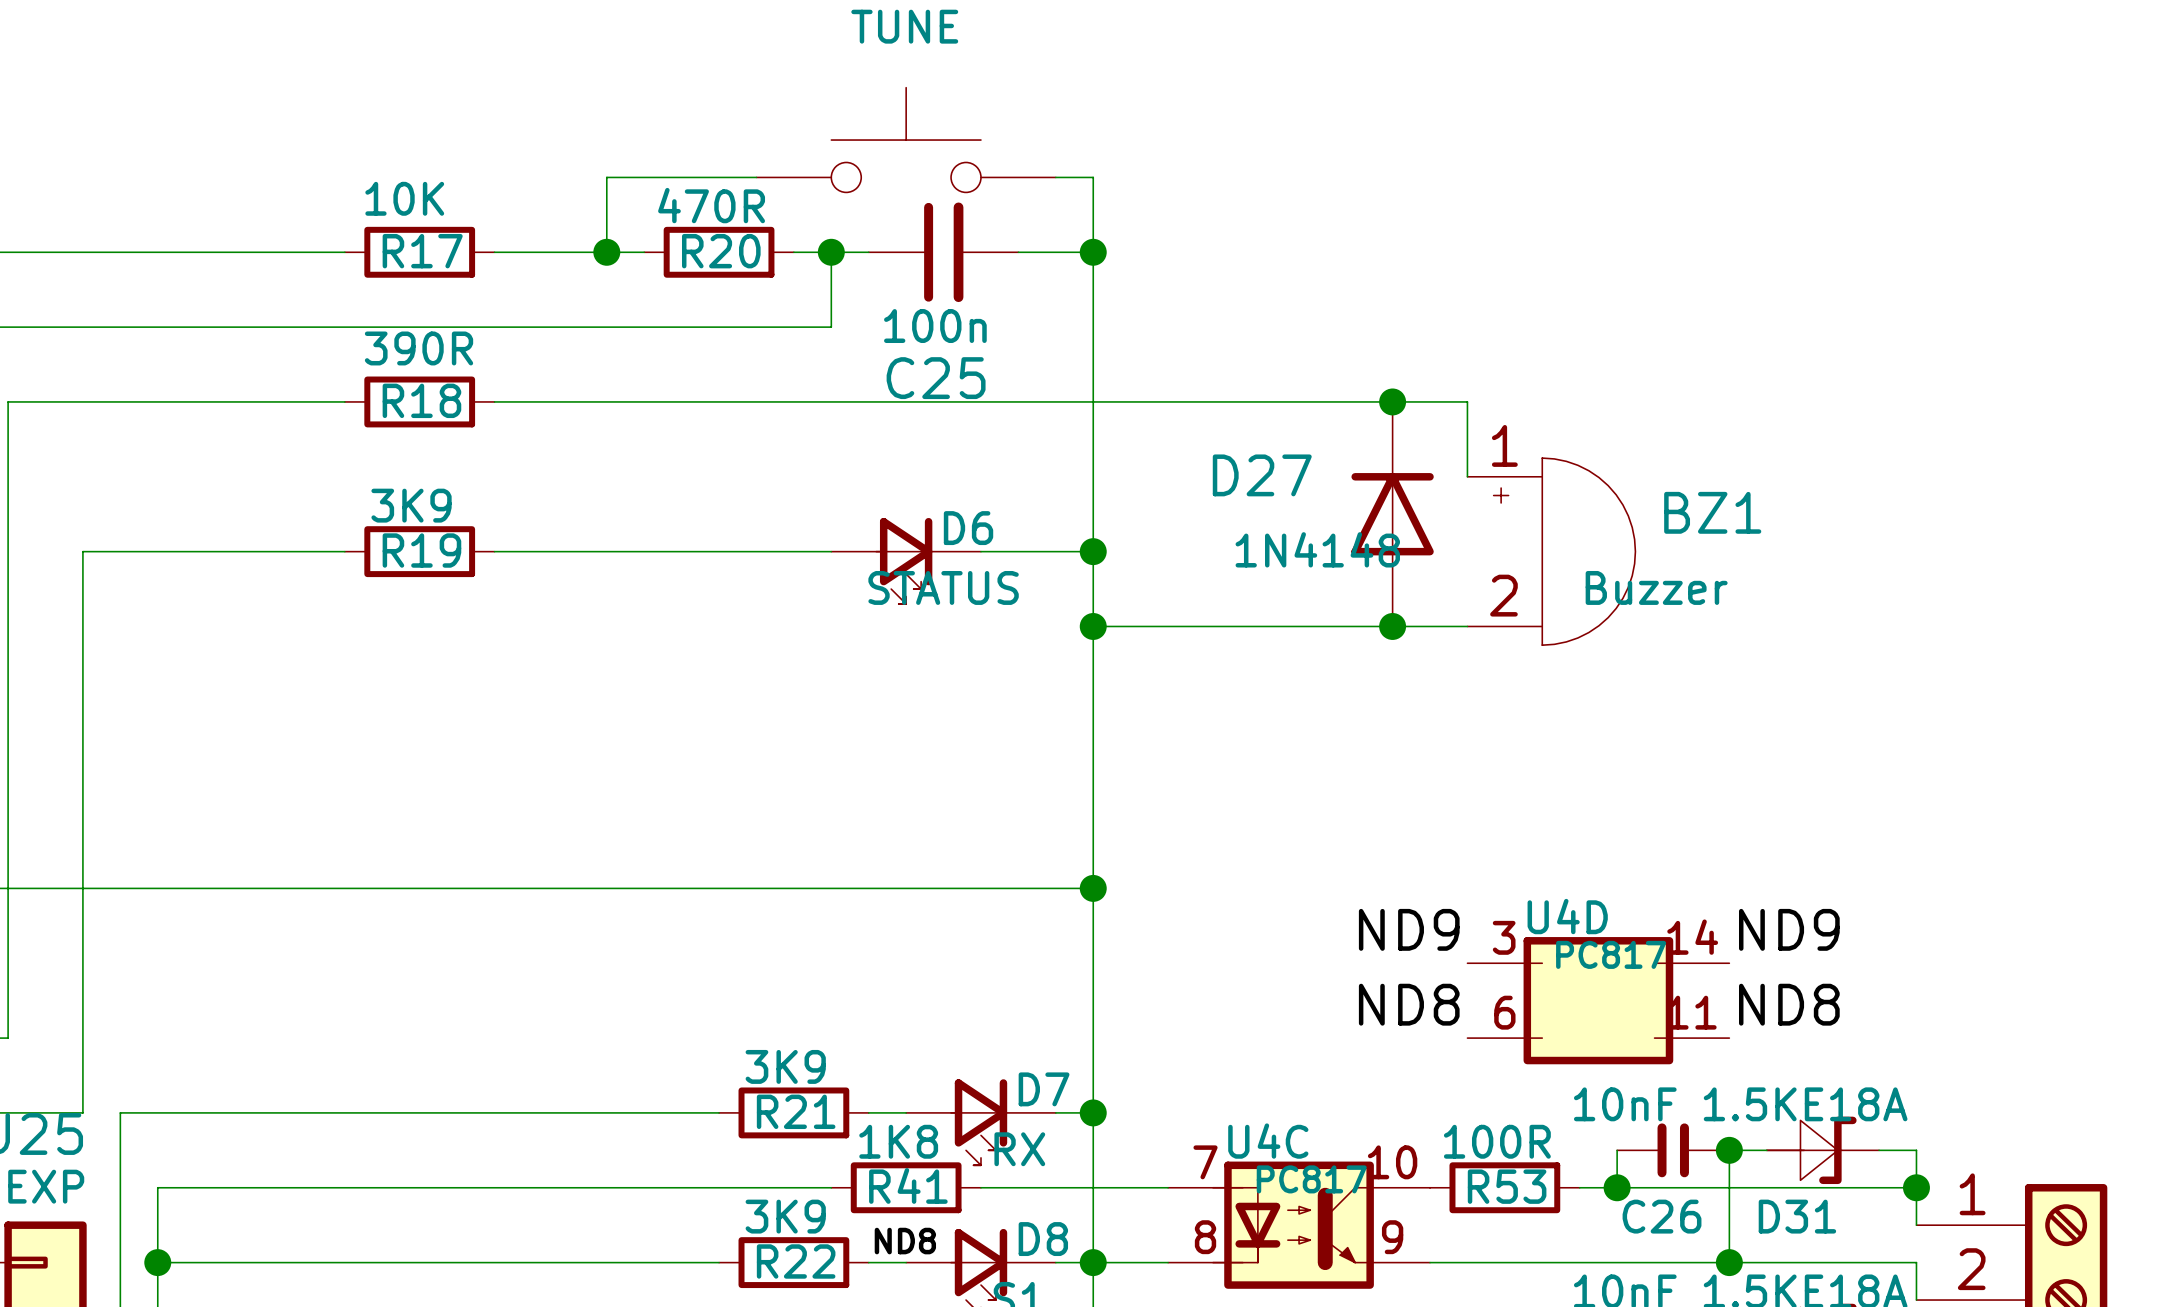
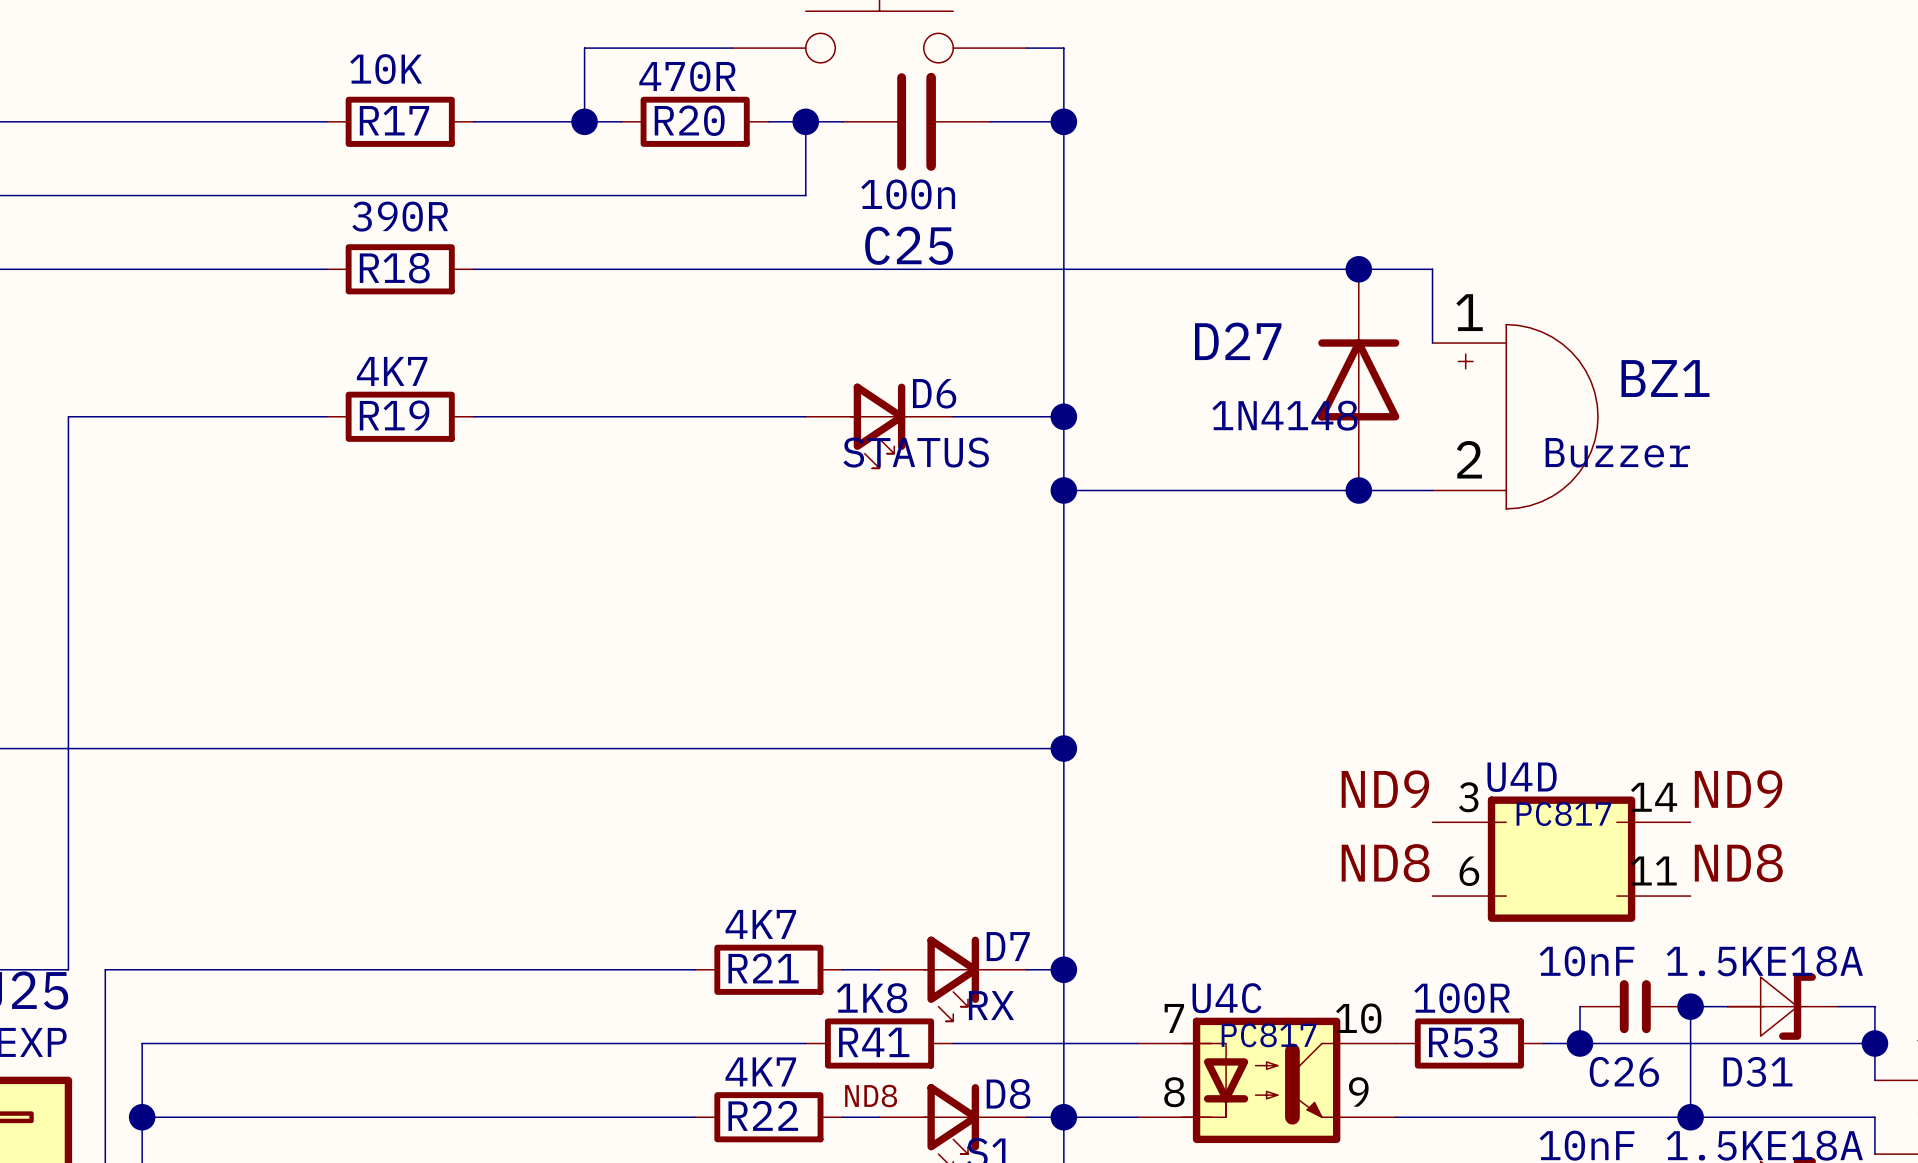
R19 value: 3K9 (411, 505) -> 4K7 (392, 371)
R21 value: 3K9 (785, 1066) -> 4K7 (760, 924)
R22 value: 3K9 (785, 1216) -> 4K7 (760, 1071)

